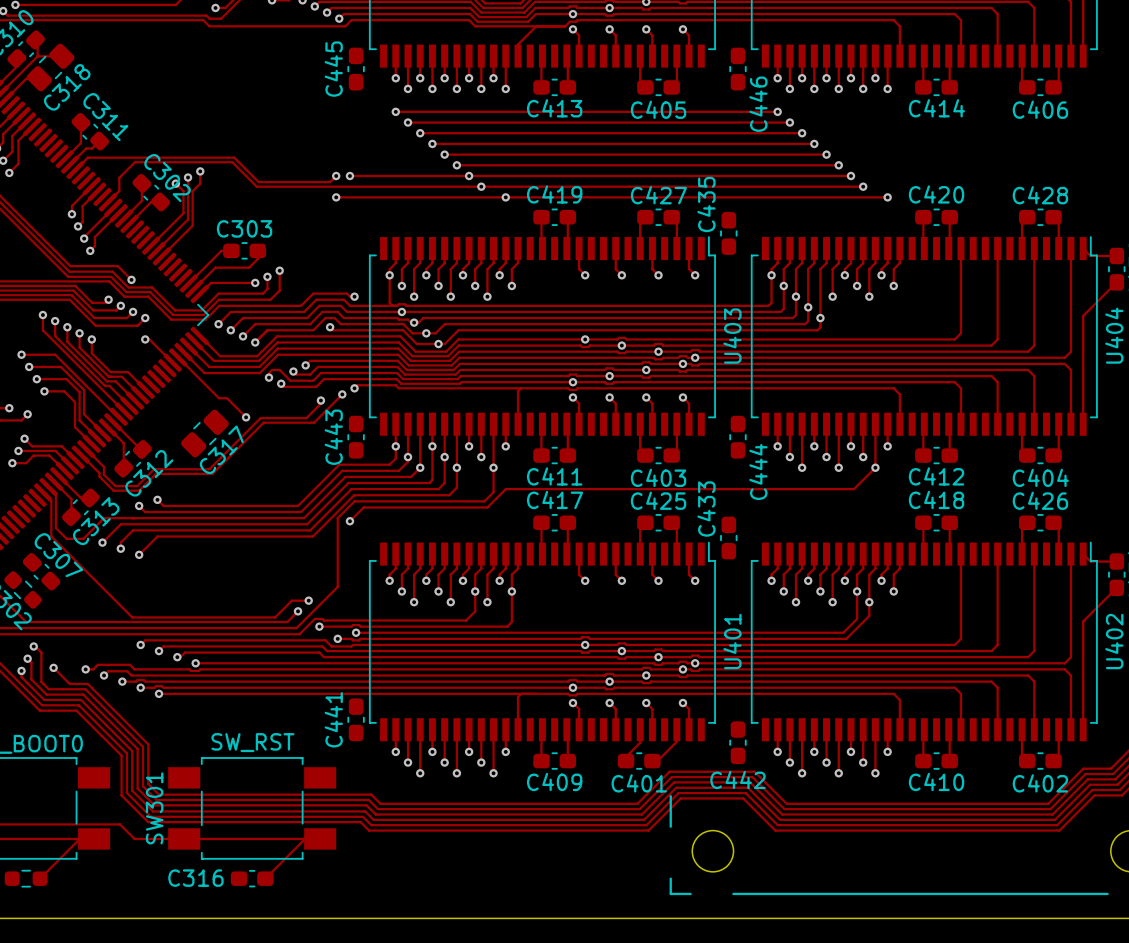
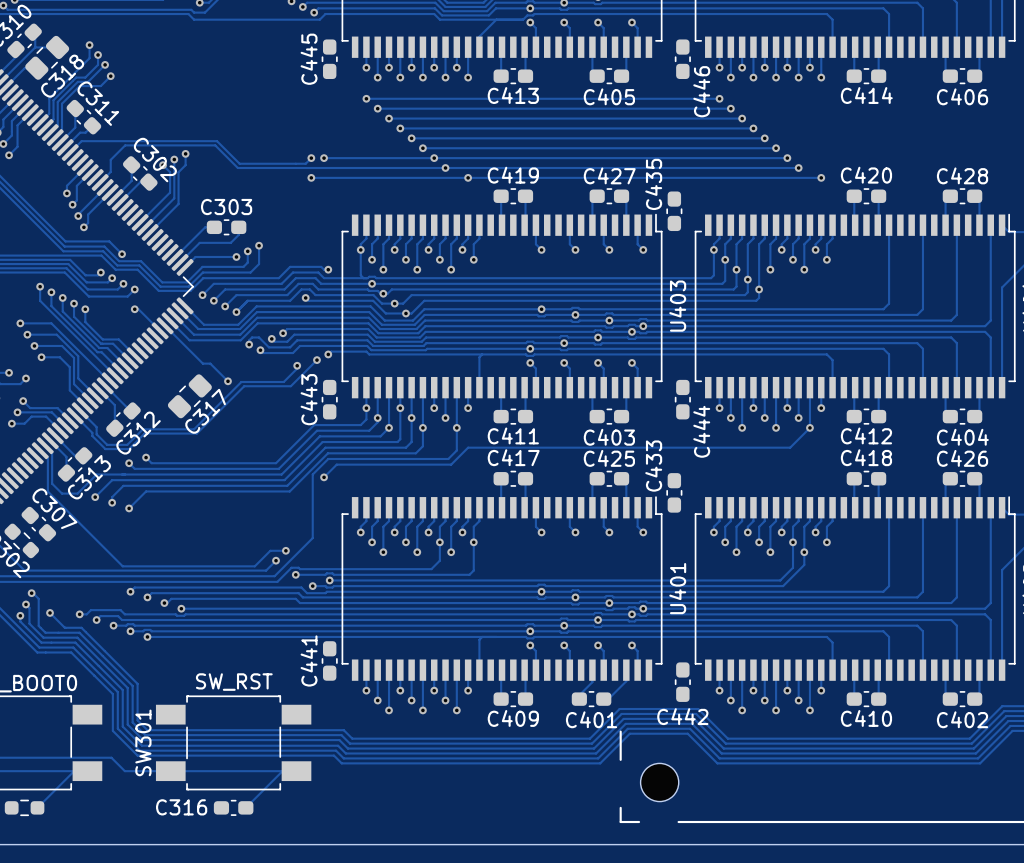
track: none -> (89, 45) (89, 58) (49, 98) (49, 113) (40, 122)
via: none -> (89, 45)
track: none -> (98, 54) (98, 64) (85, 77) (76, 77) (53, 100) (53, 119) (45, 127)
via: none -> (98, 54)
track: none -> (105, 64) (88, 81) (77, 81) (57, 101) (57, 125) (50, 132)
via: none -> (105, 64)
track: none -> (110, 76) (100, 86) (79, 86) (61, 103) (61, 130) (55, 137)
via: none -> (110, 76)

